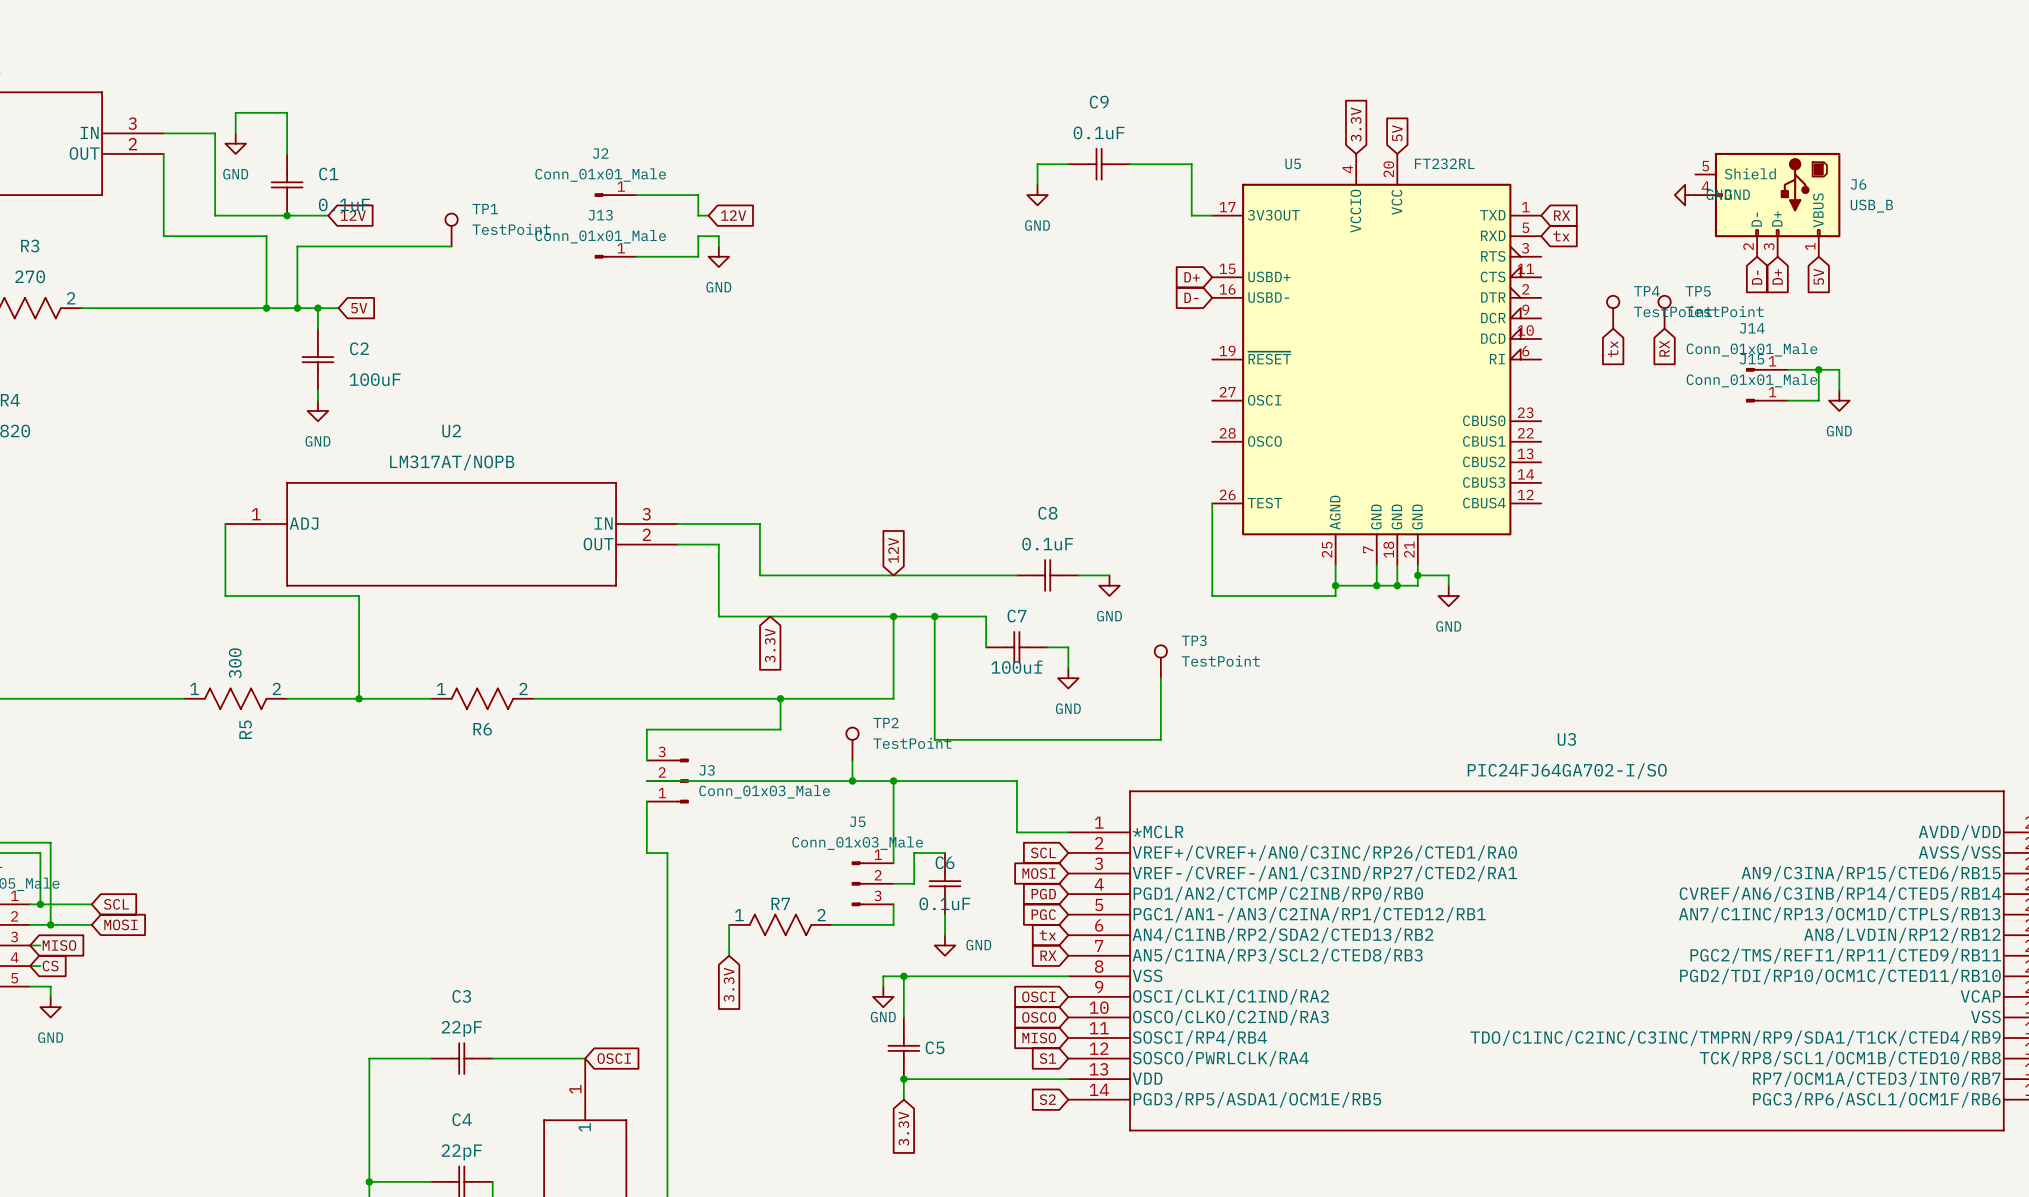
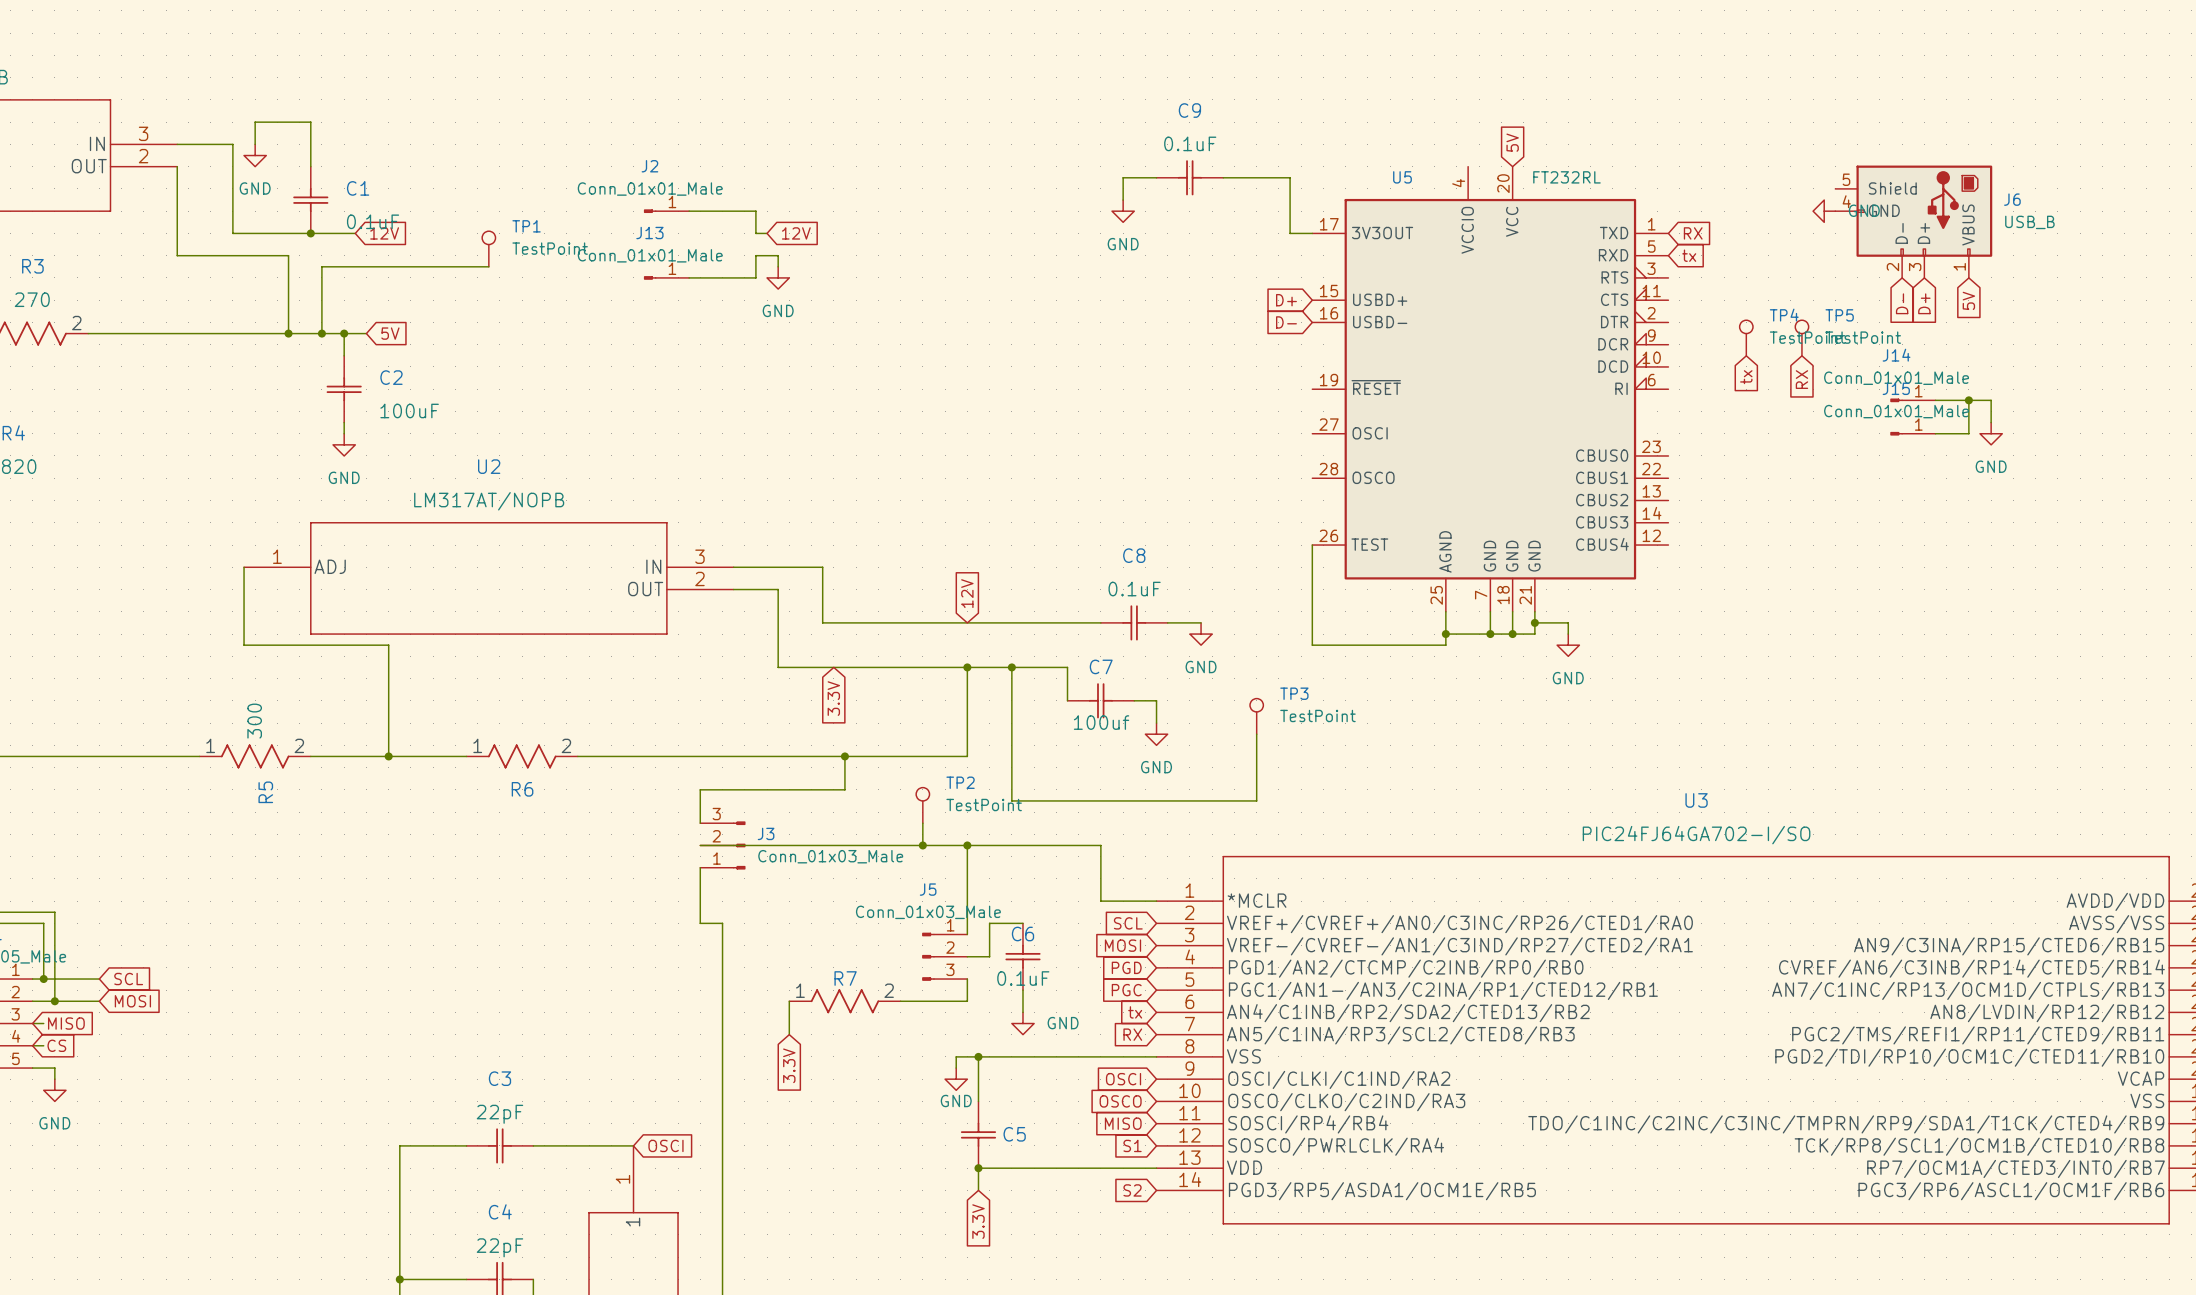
global label: 3.3V (1356, 124) -> none

